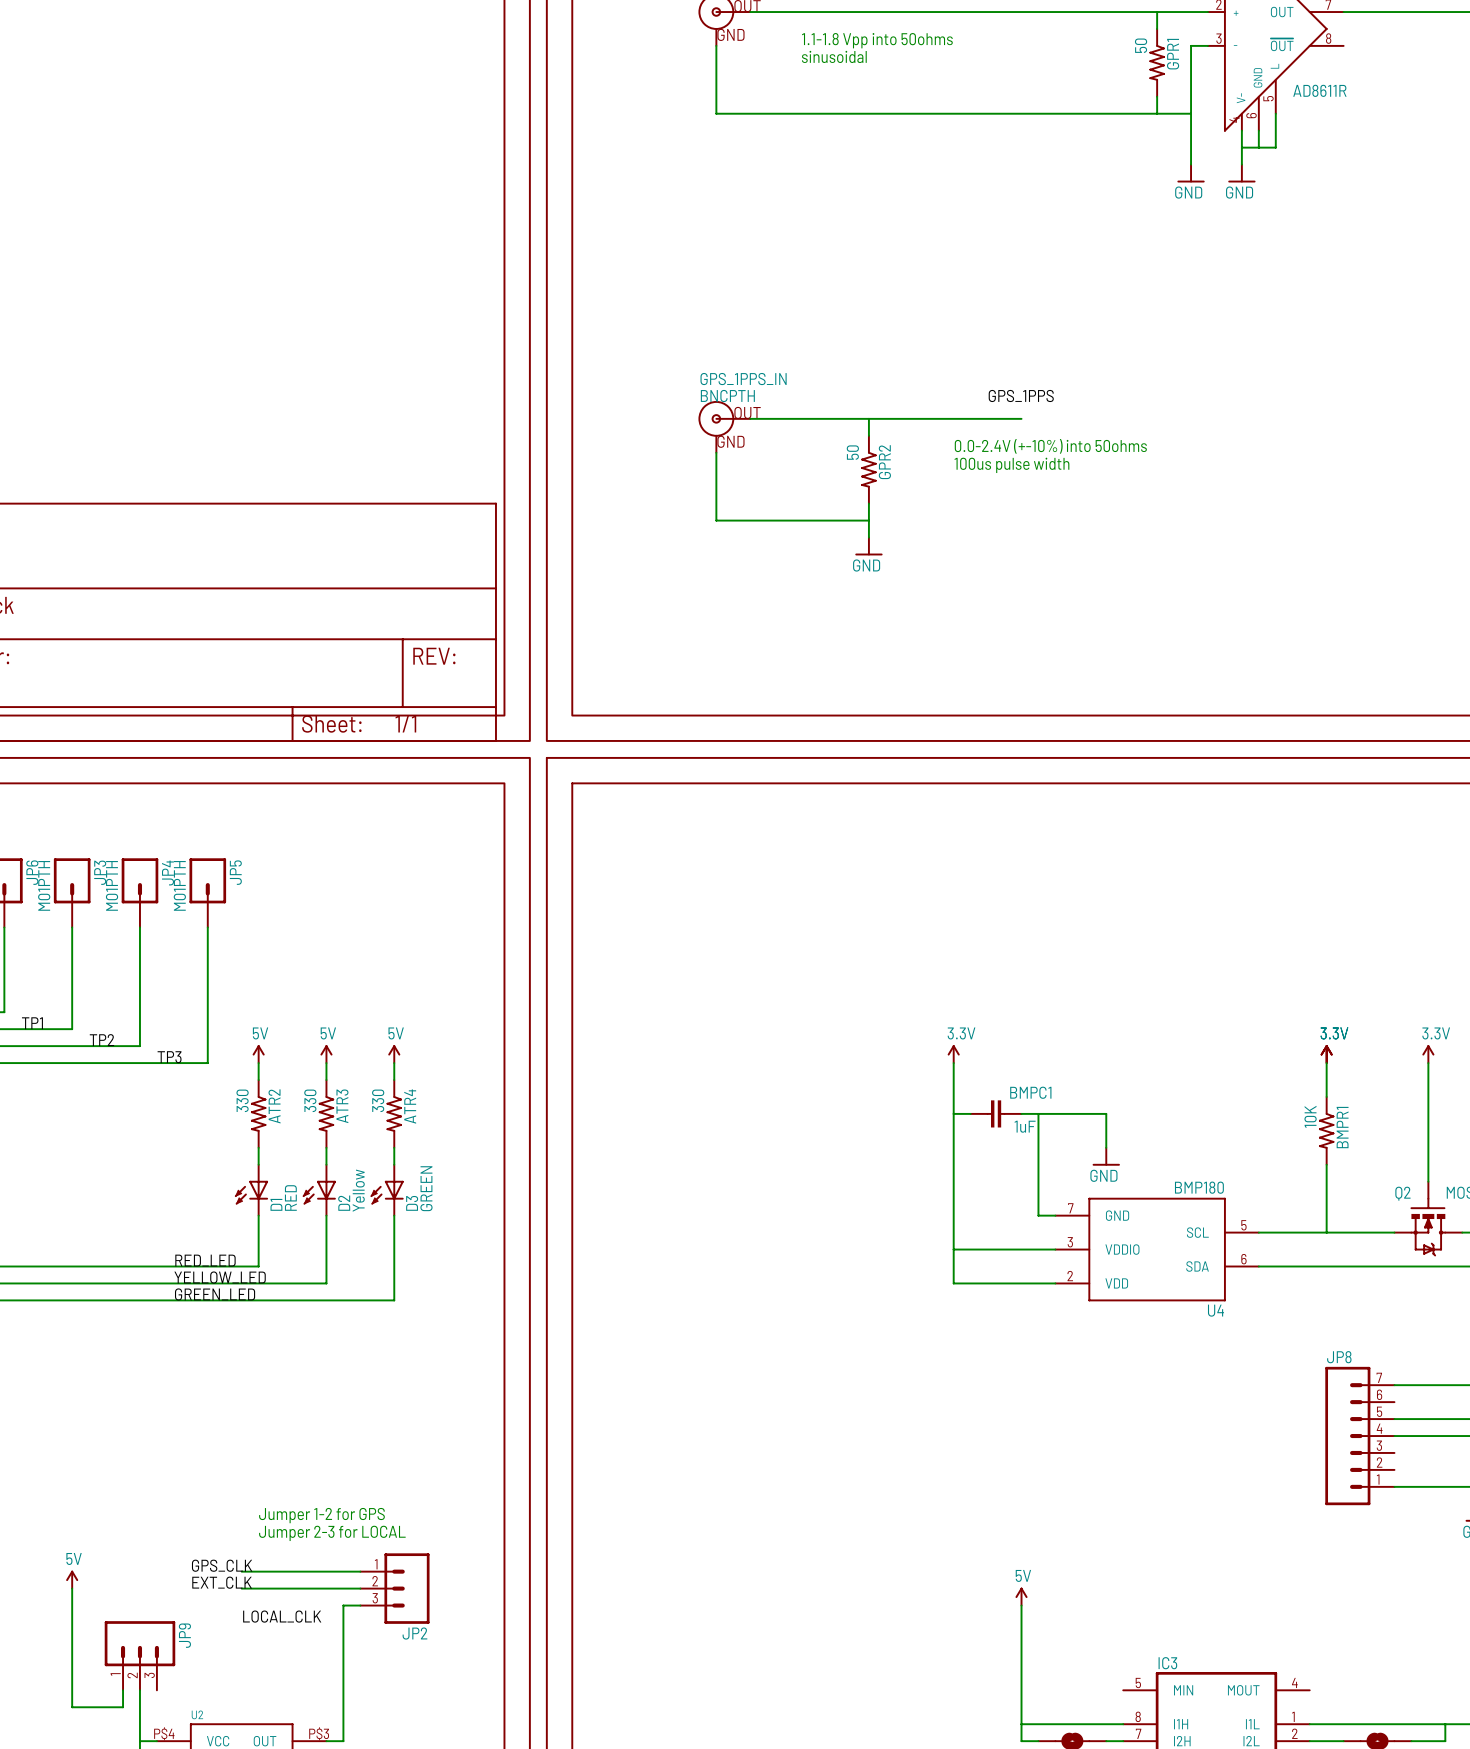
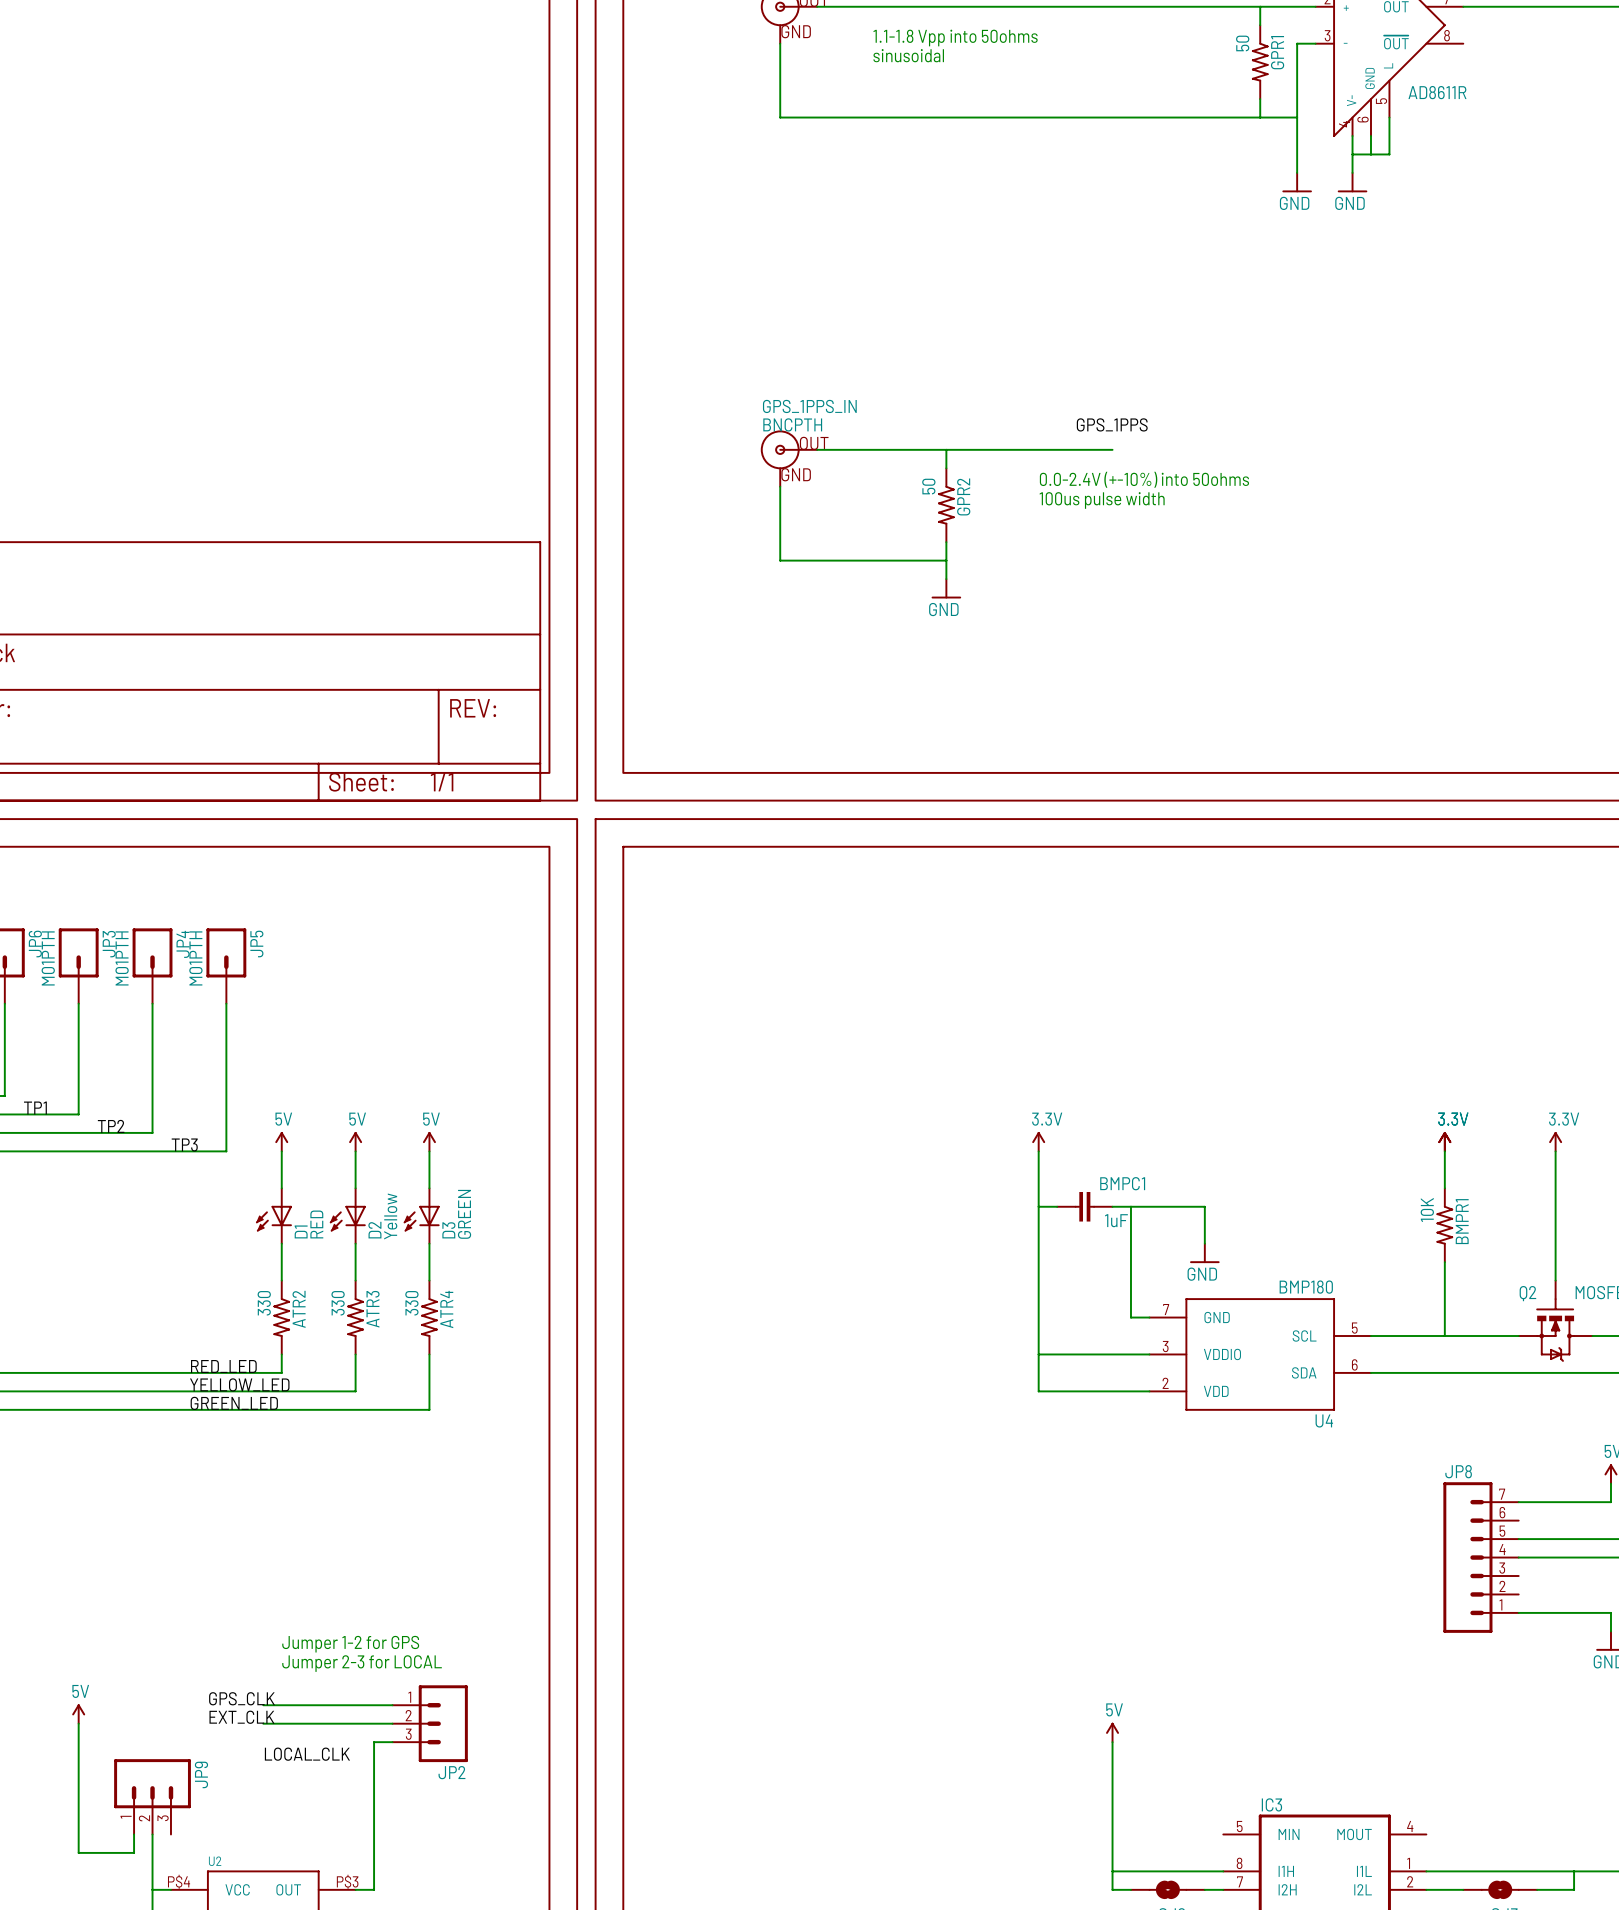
ATR2 position: (258, 1113) -> (281, 1317)
ATR3 position: (326, 1113) -> (355, 1317)
ATR4 position: (394, 1113) -> (429, 1317)
D1 position: (251, 1190) -> (274, 1216)
D2 position: (319, 1190) -> (347, 1216)
D3 position: (387, 1190) -> (421, 1216)

